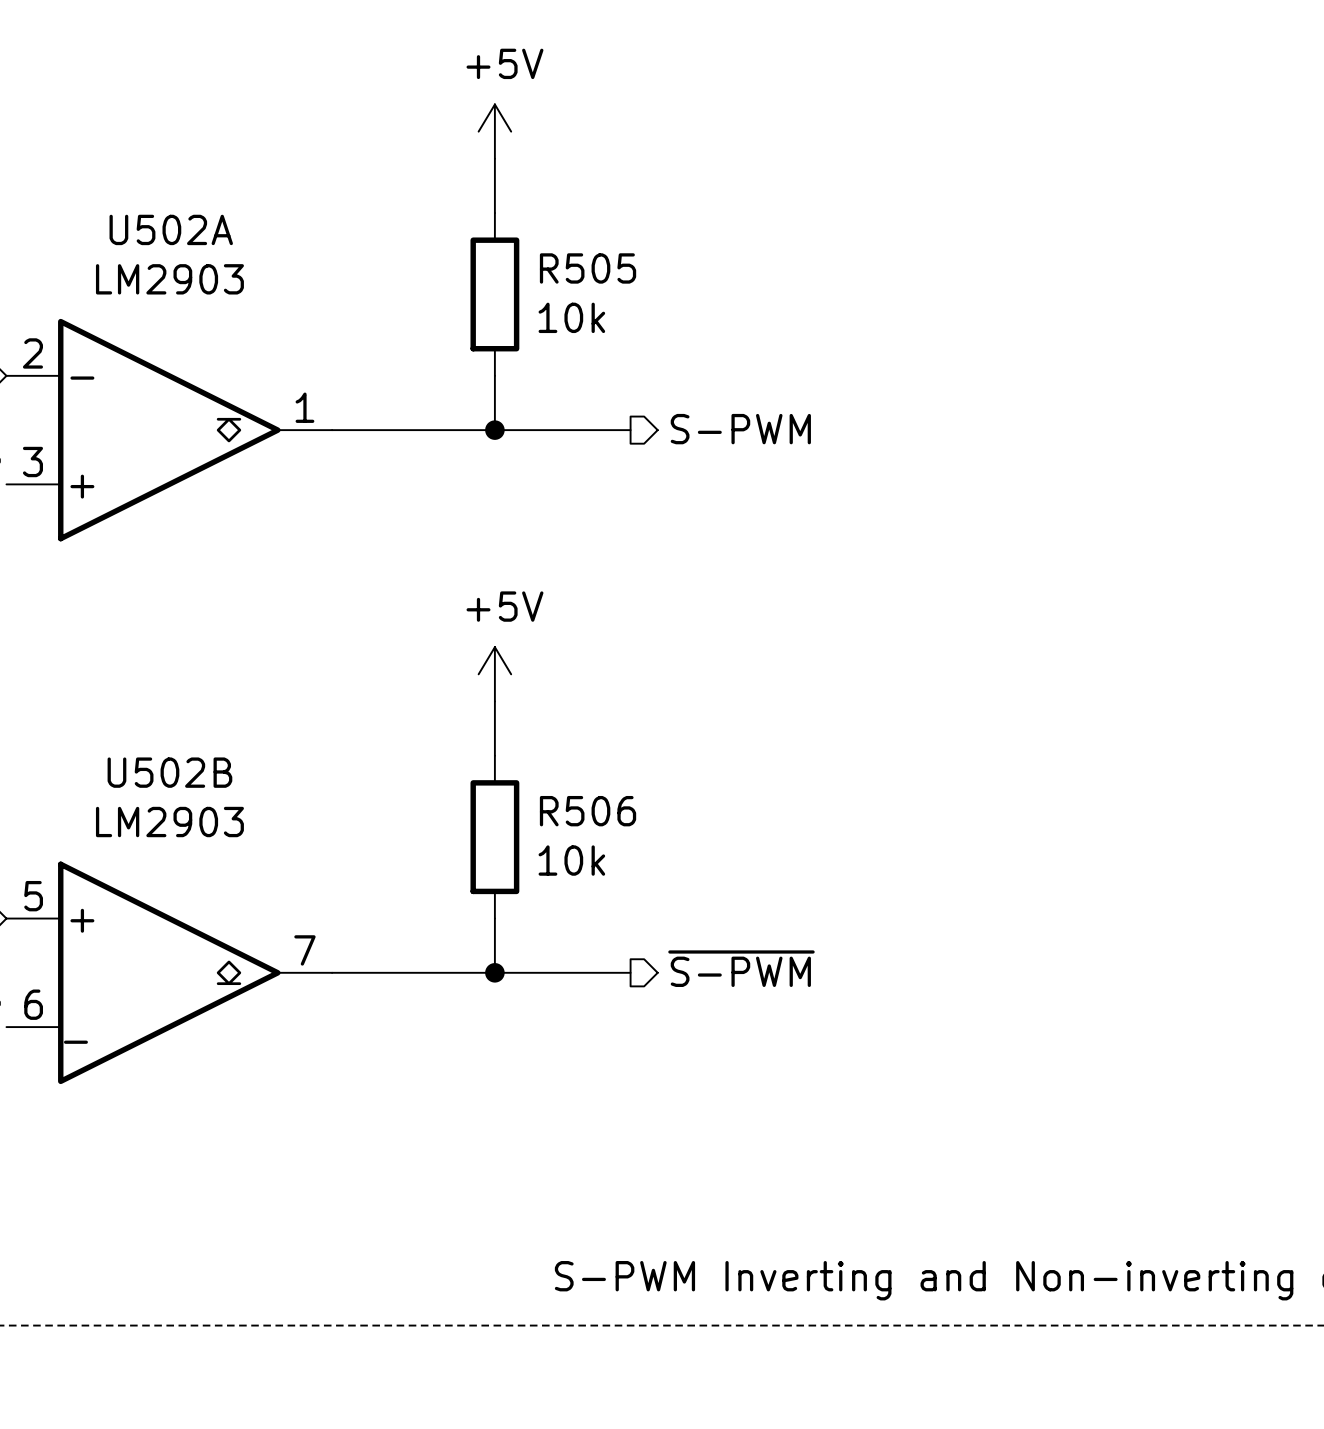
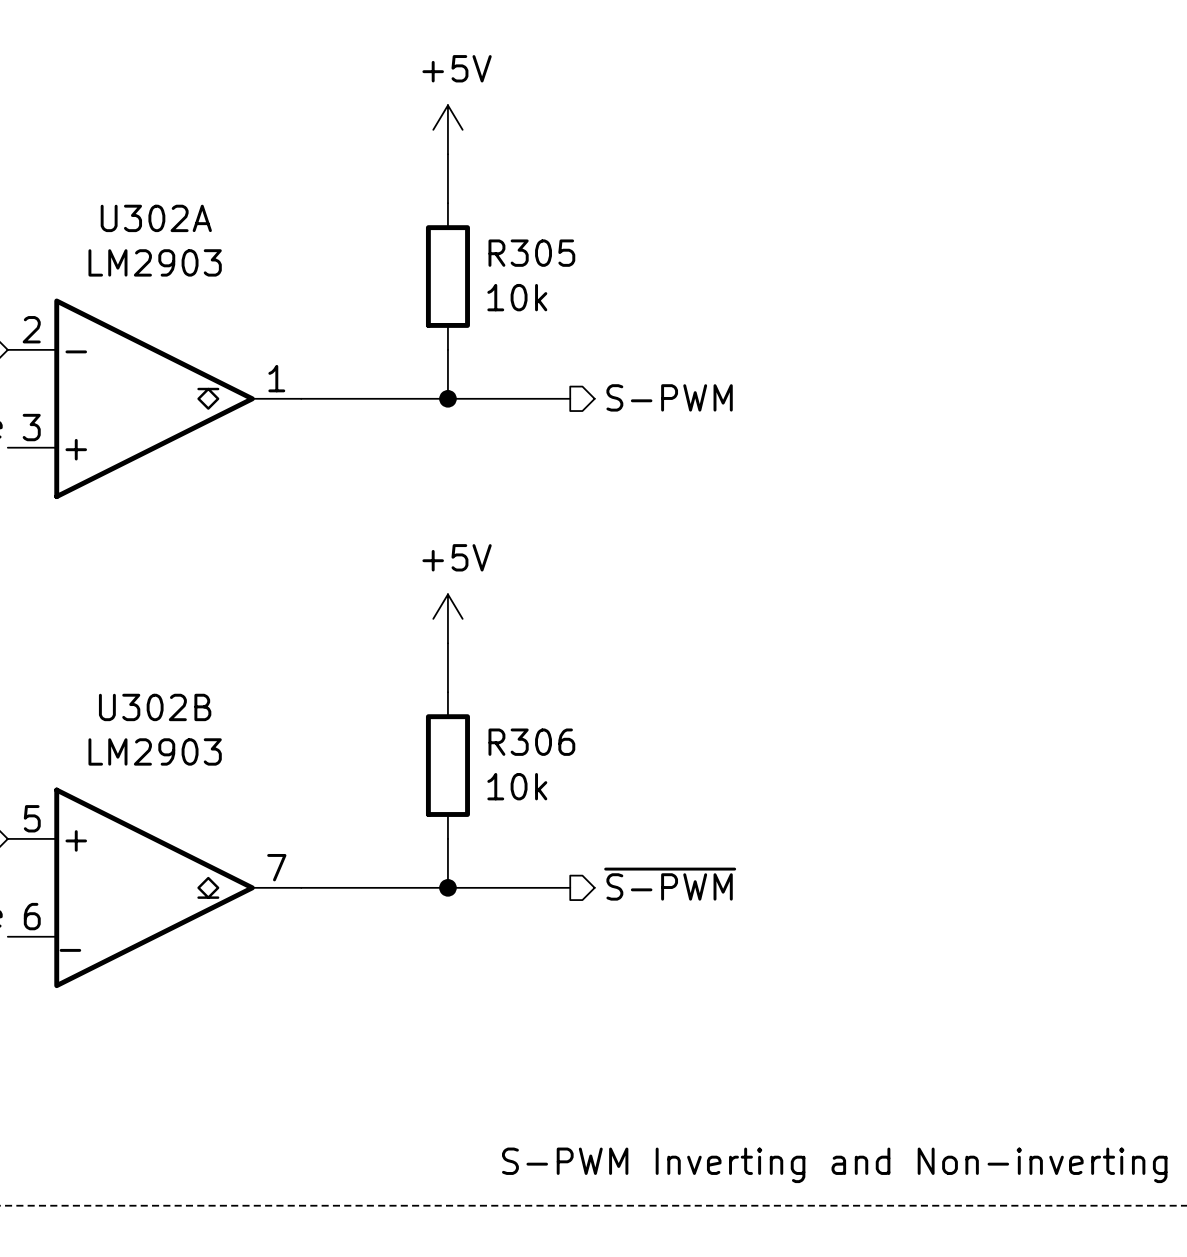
U502A name: U502A (171, 229) -> U302A (156, 218)
R505 name: R505 (588, 268) -> R305 (531, 253)
U502B name: U502B (169, 772) -> U302B (155, 707)
R506 name: R506 (588, 811) -> R306 (531, 742)

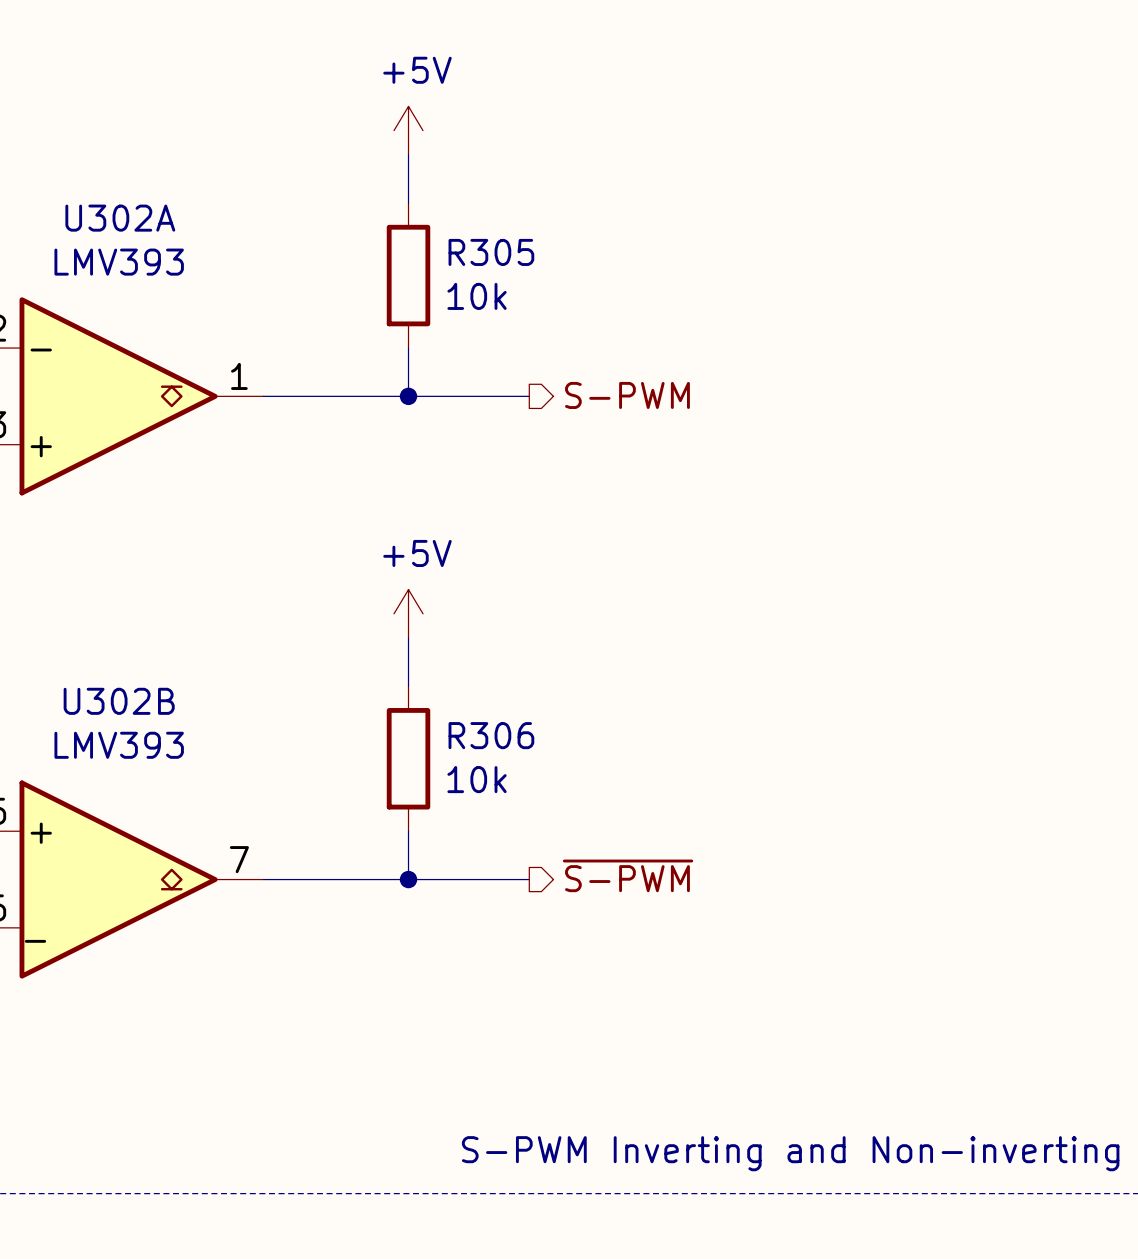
U302A value: LM2903 (155, 262) -> LMV393 (119, 262)
U302B value: LM2903 (155, 751) -> LMV393 (119, 745)

